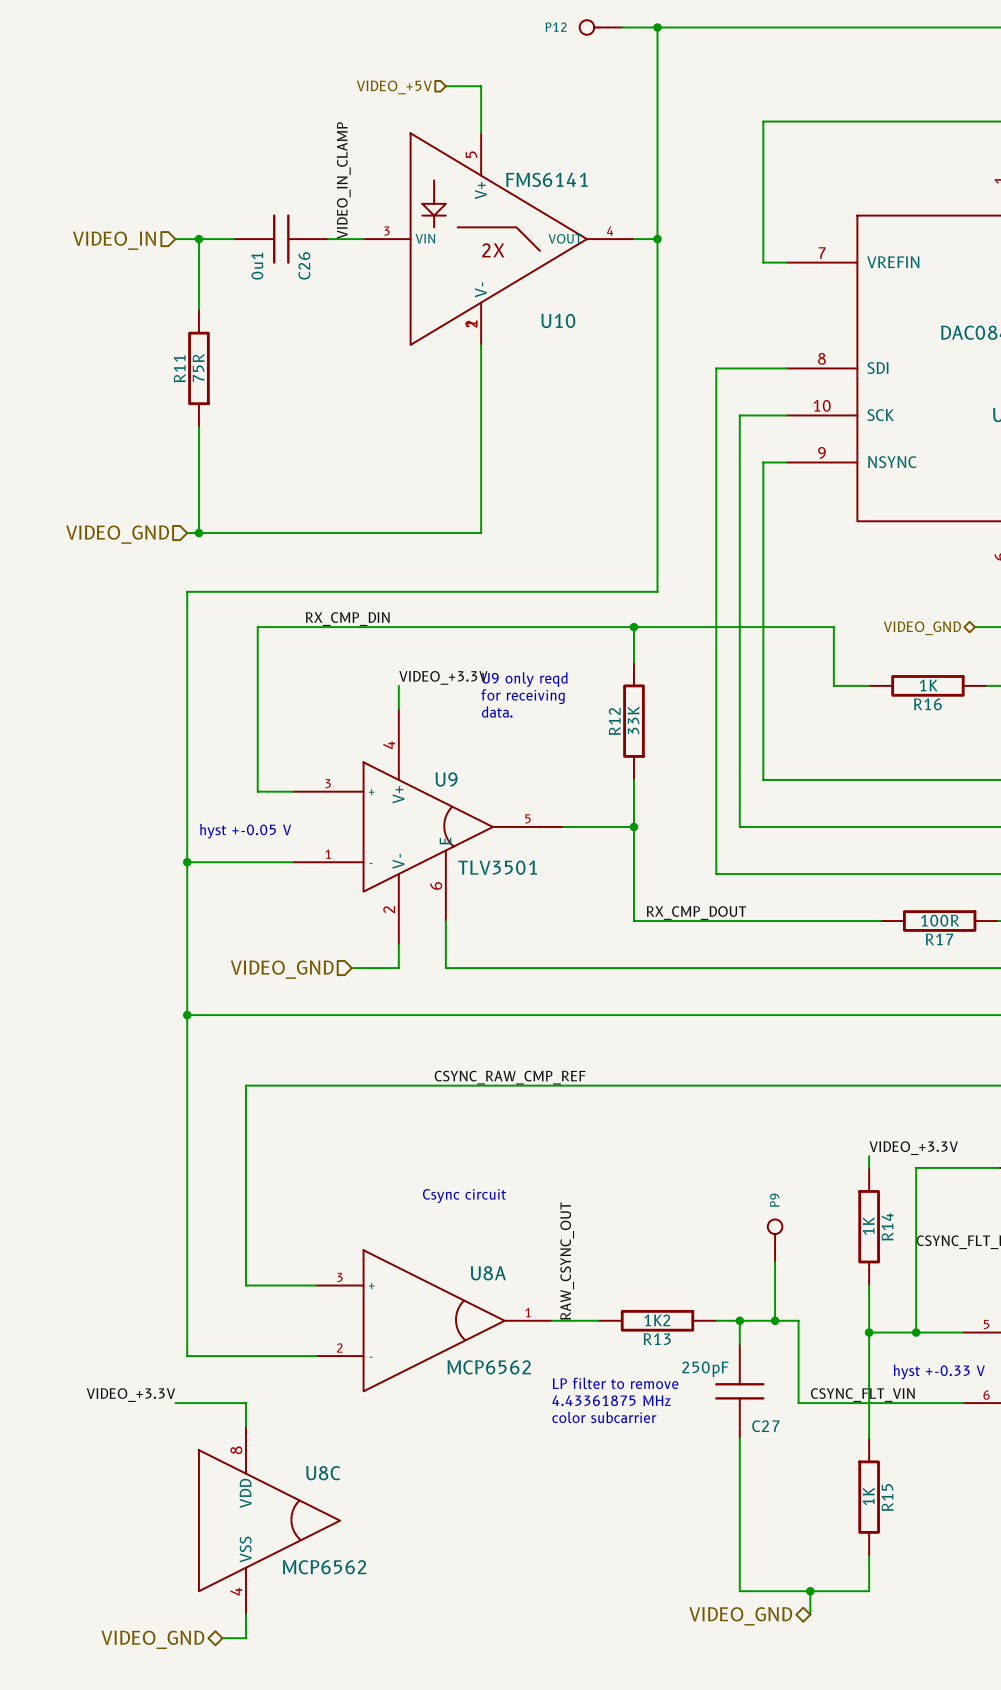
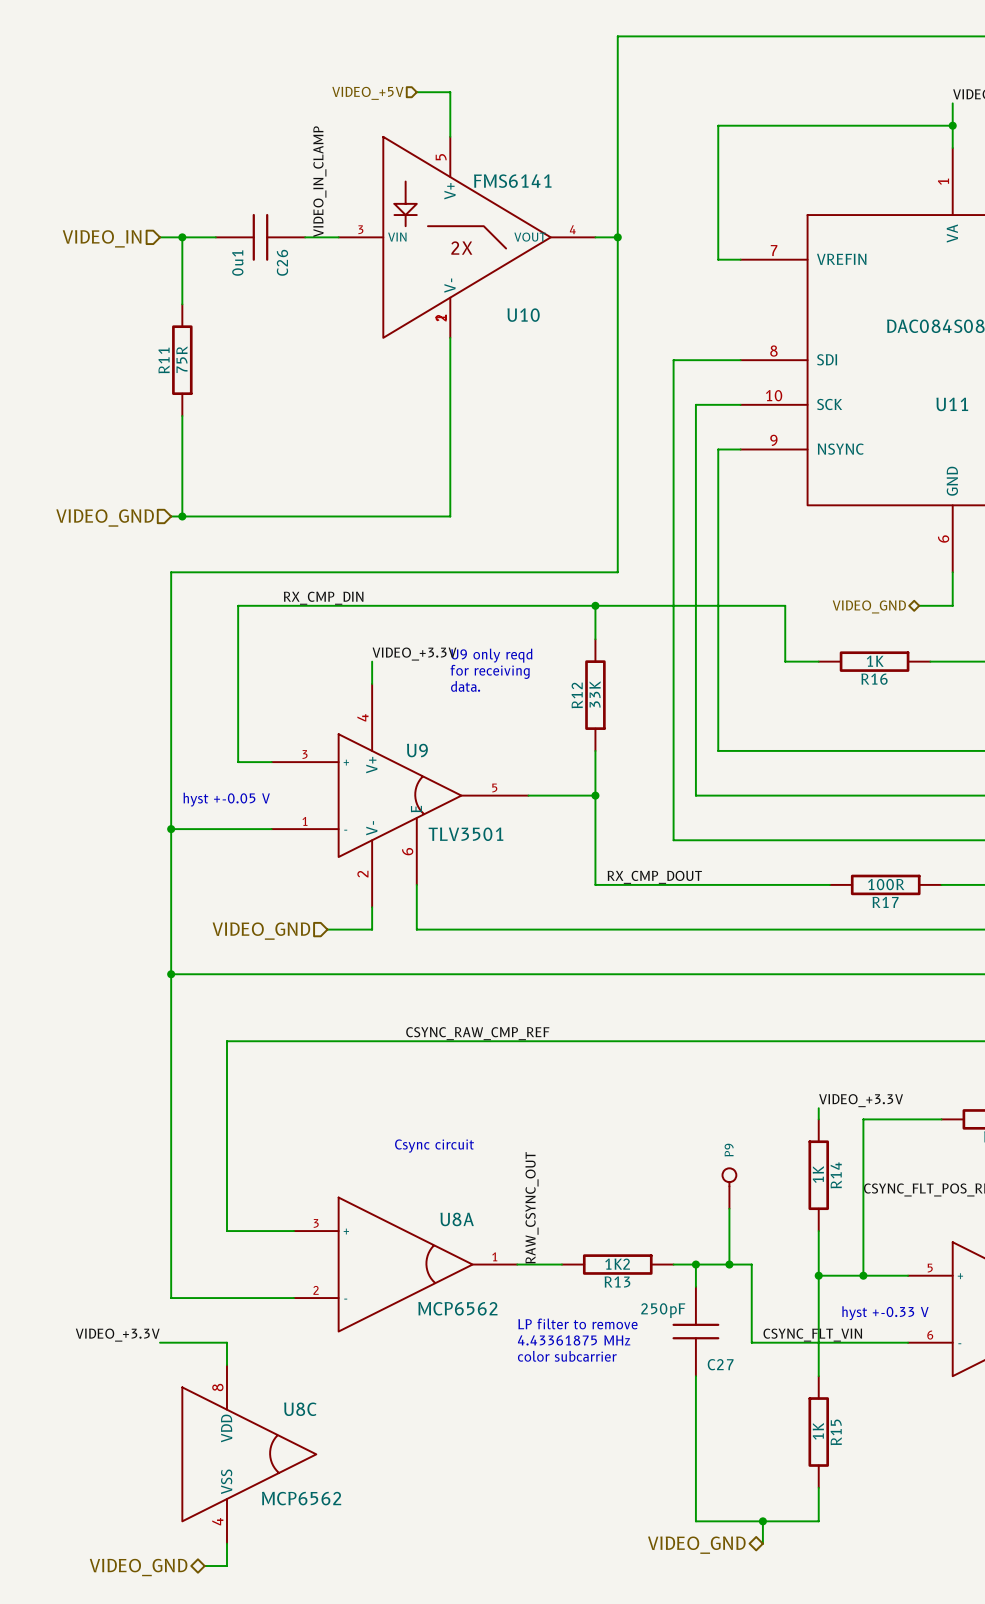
P12: (600, 27) -> none
wire: (622, 27) (657, 27) -> none
junction: (657, 27) -> none

